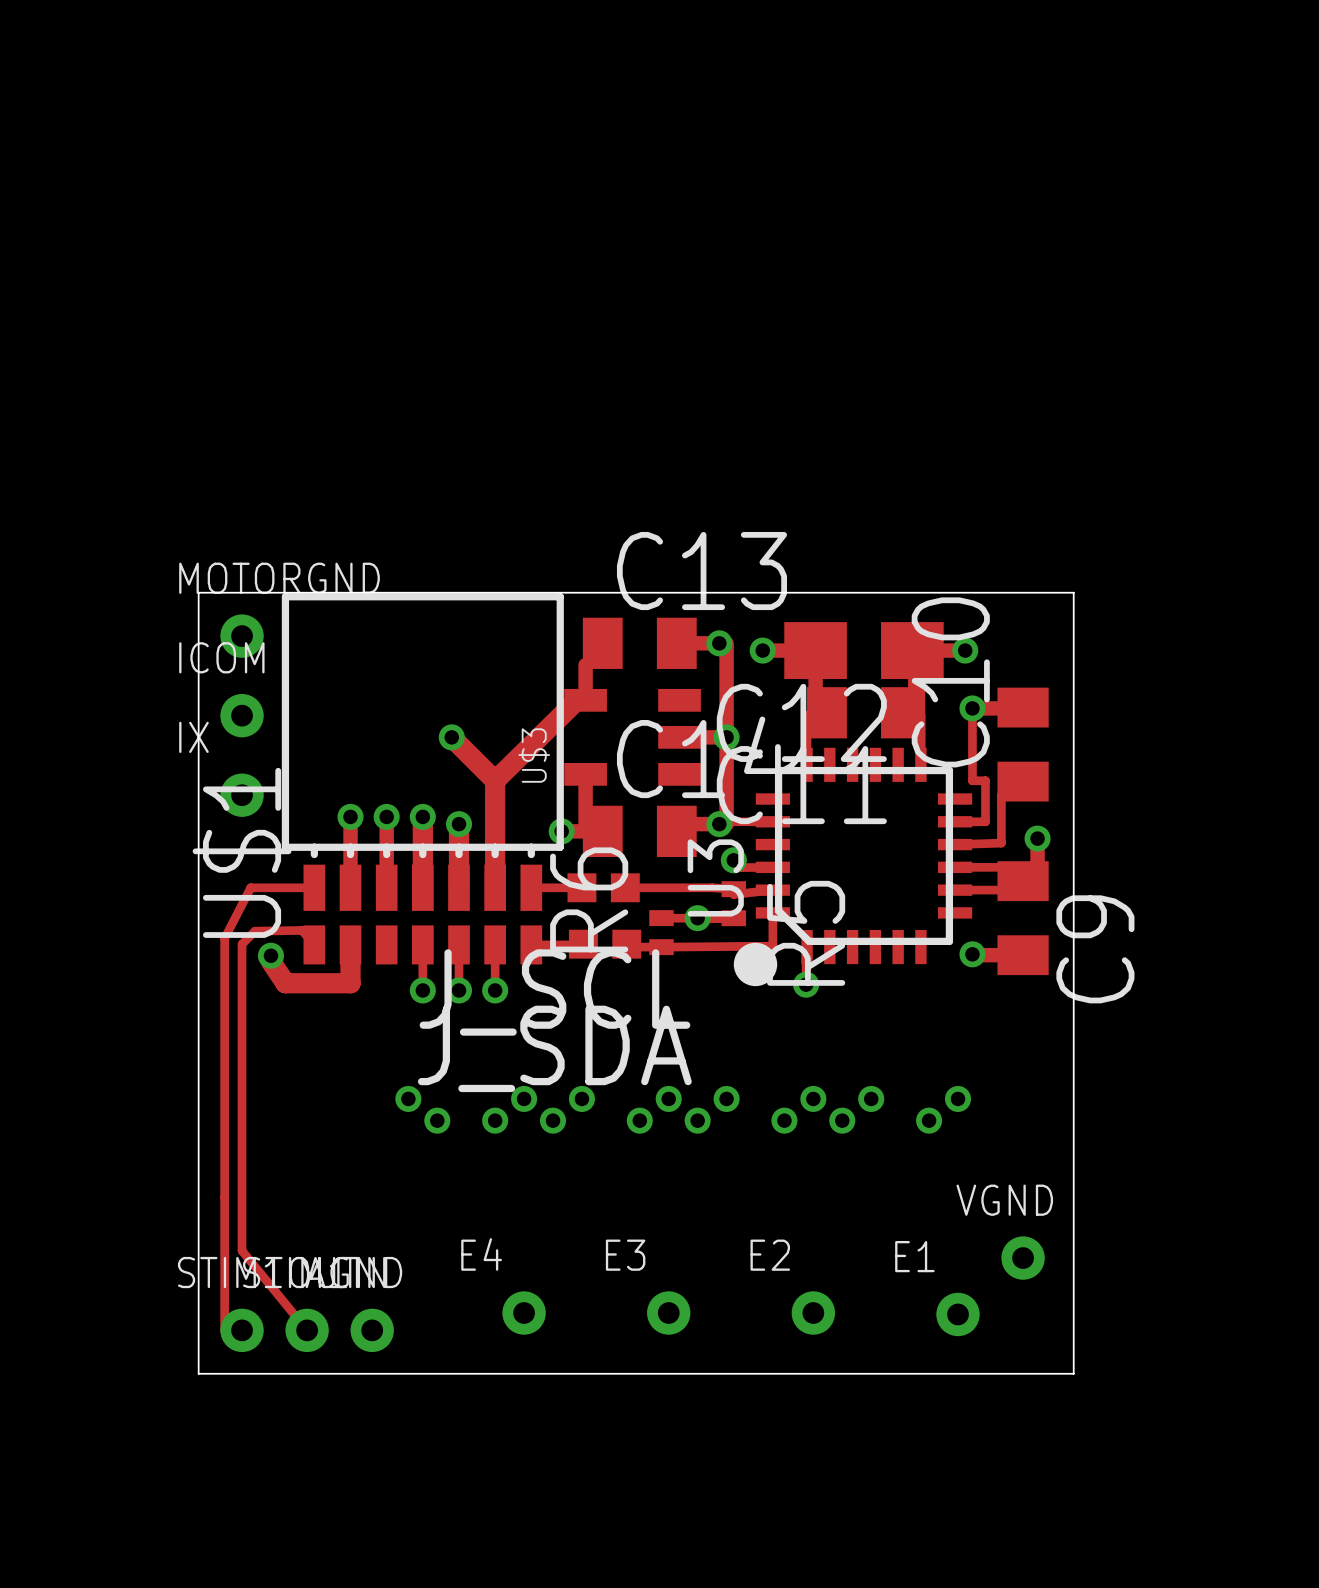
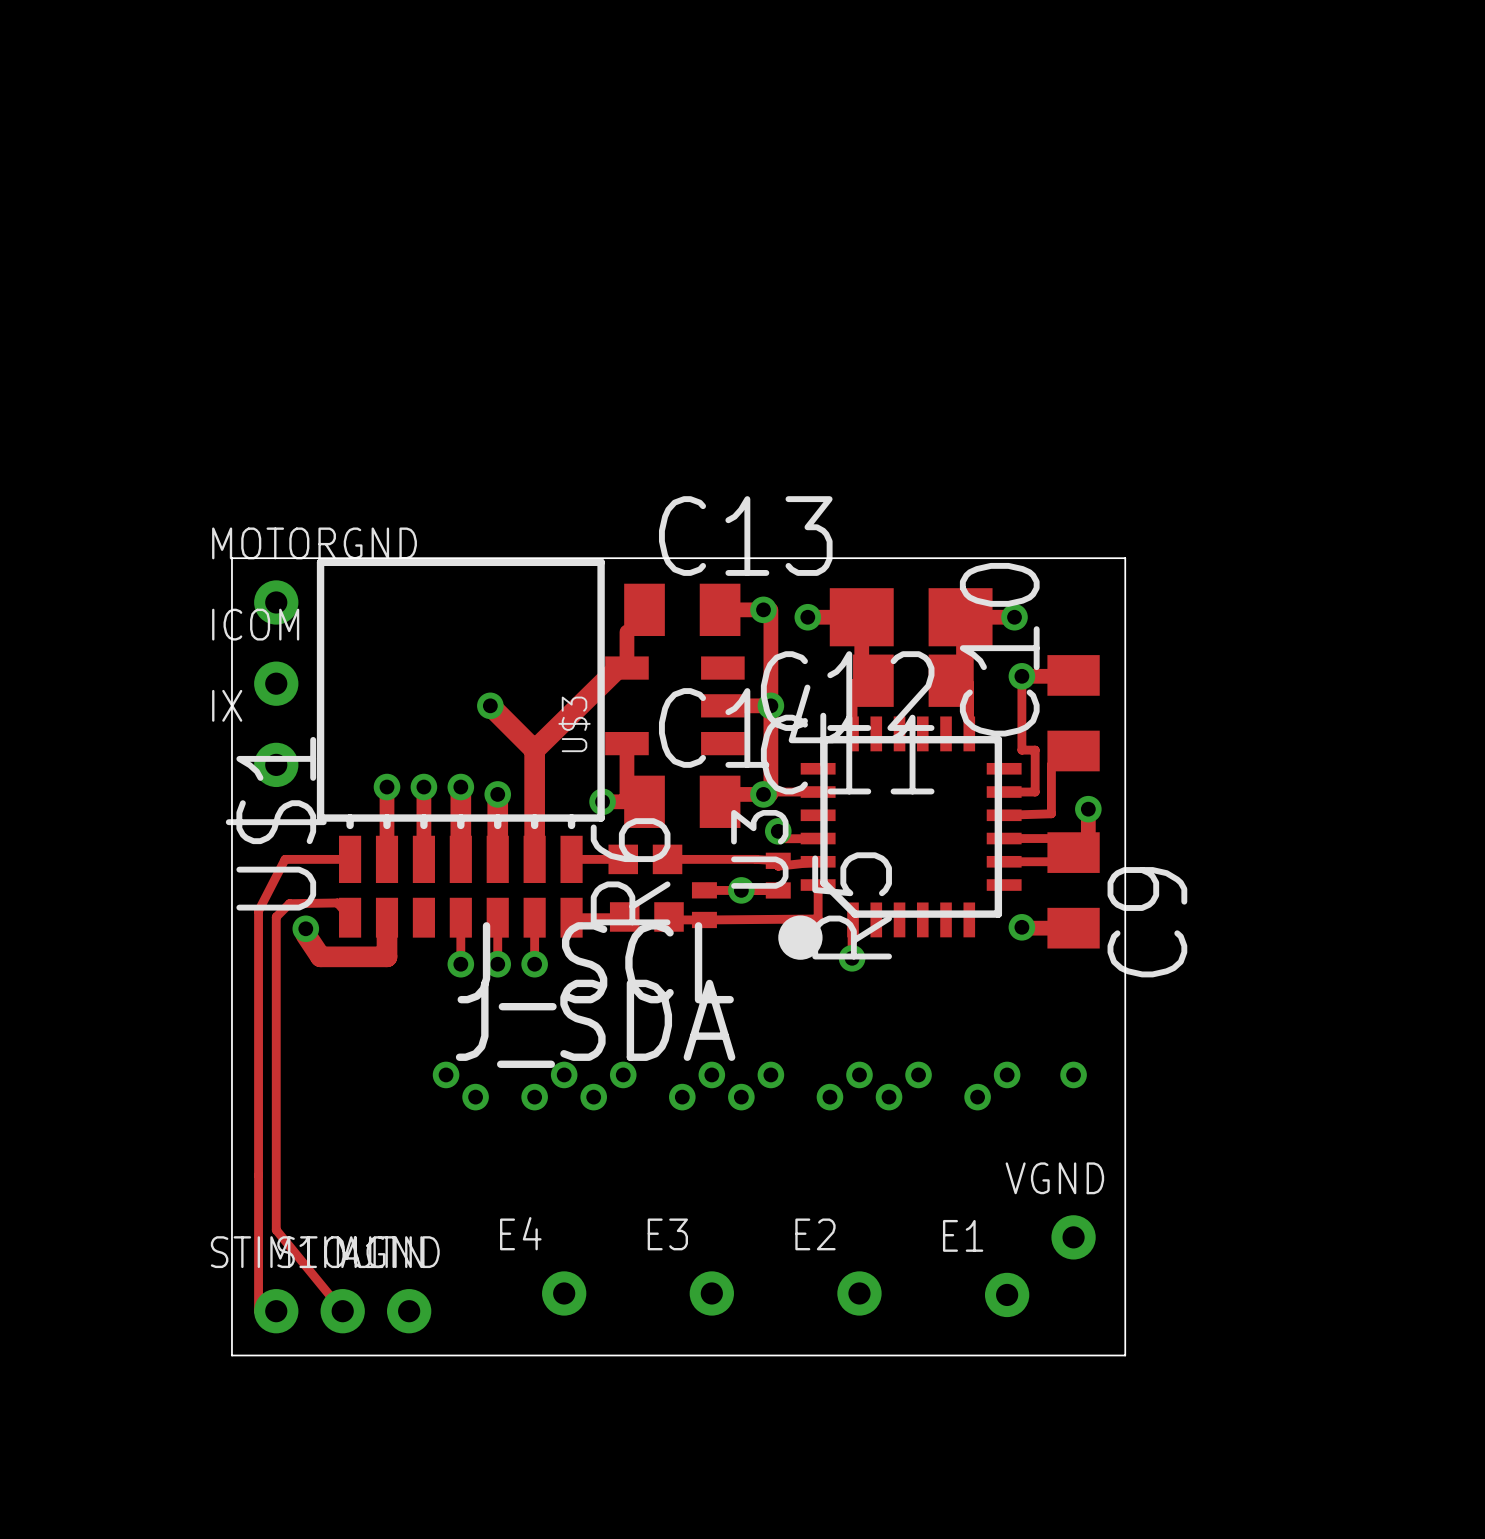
via: none -> (1073, 1074)

